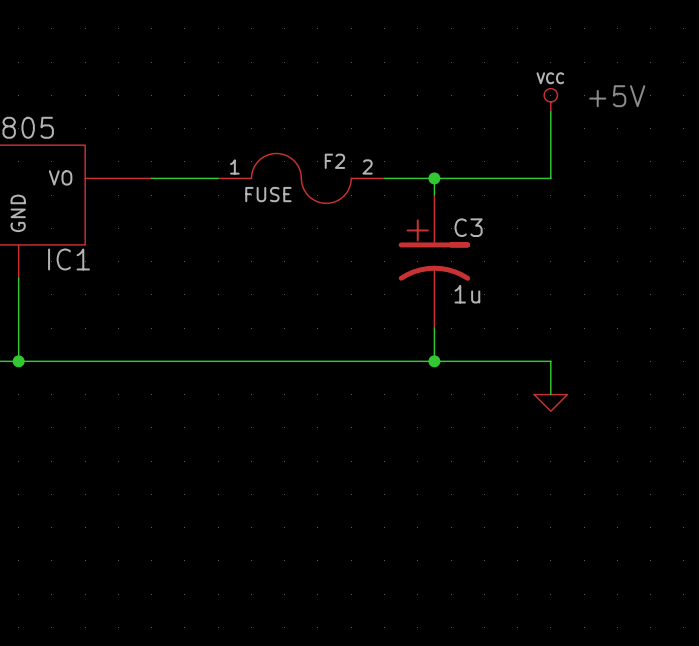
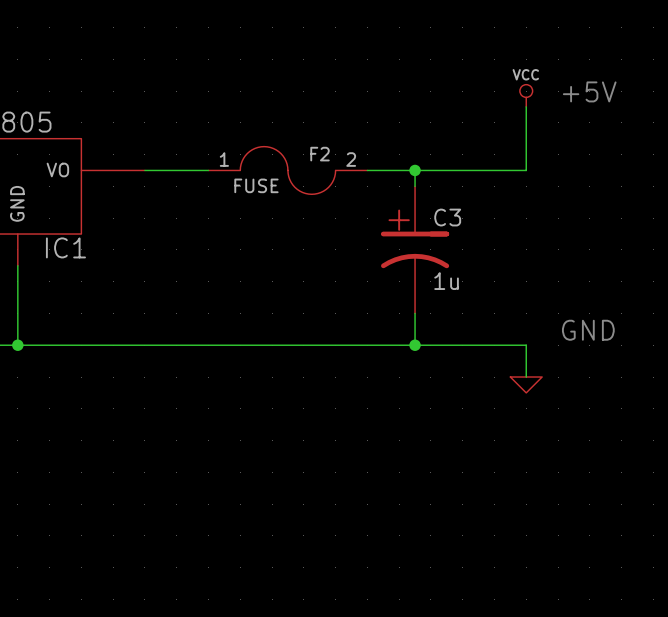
text: none -> GND (588, 330)

